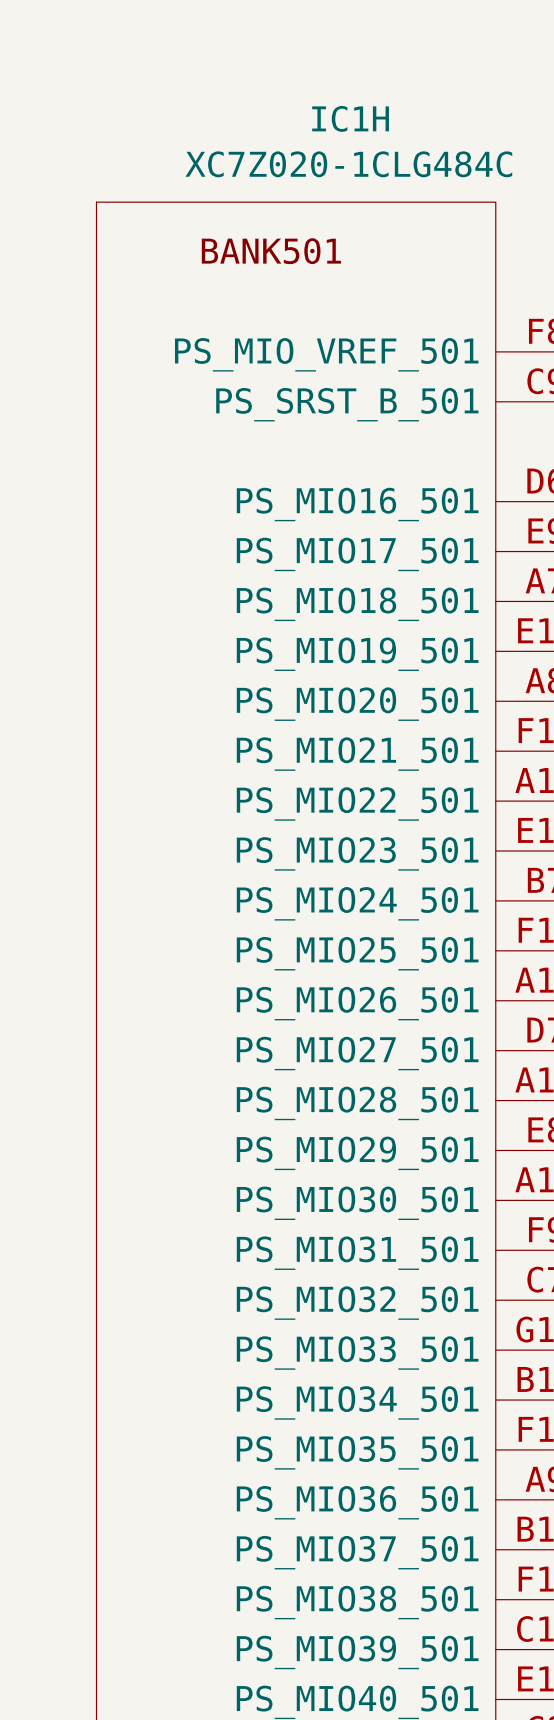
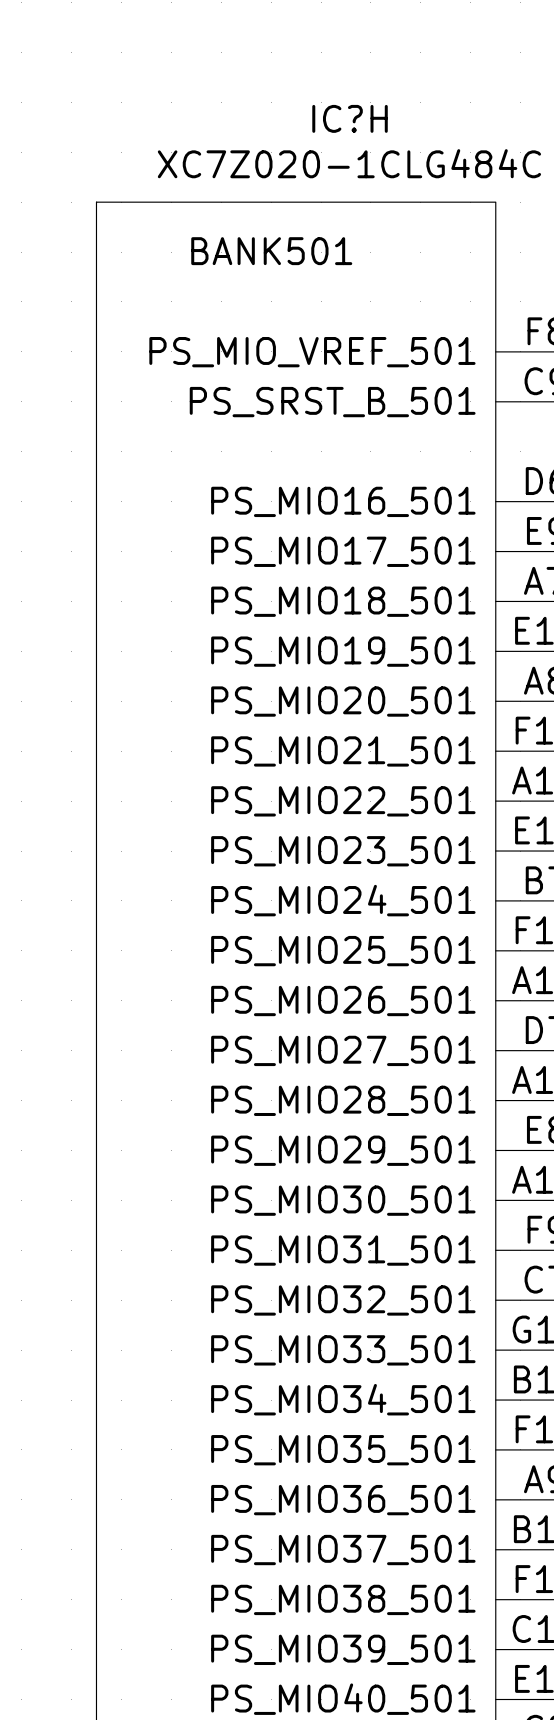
IC1H name: IC1H (350, 118) -> IC?H (350, 118)

